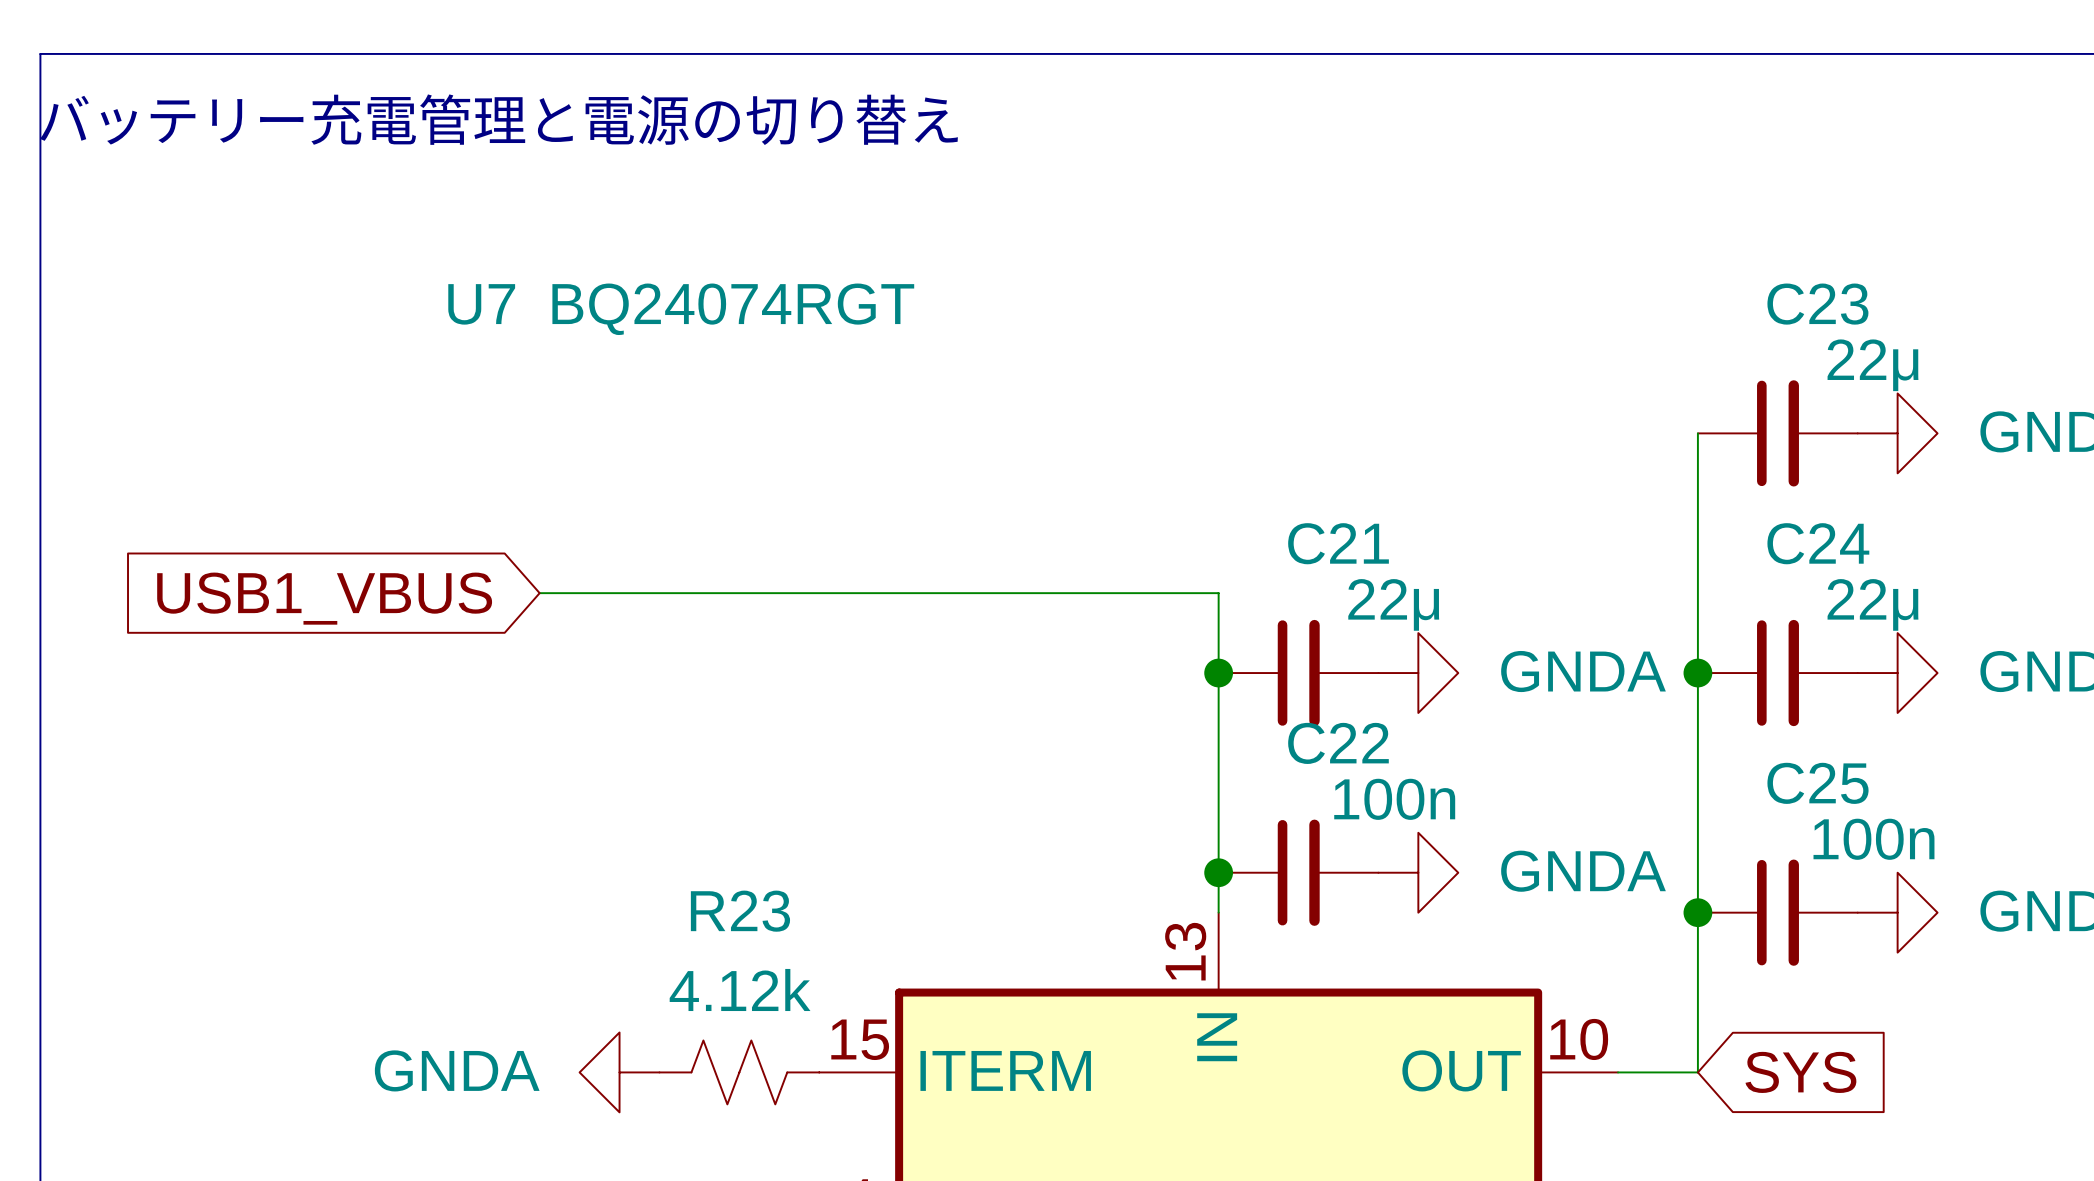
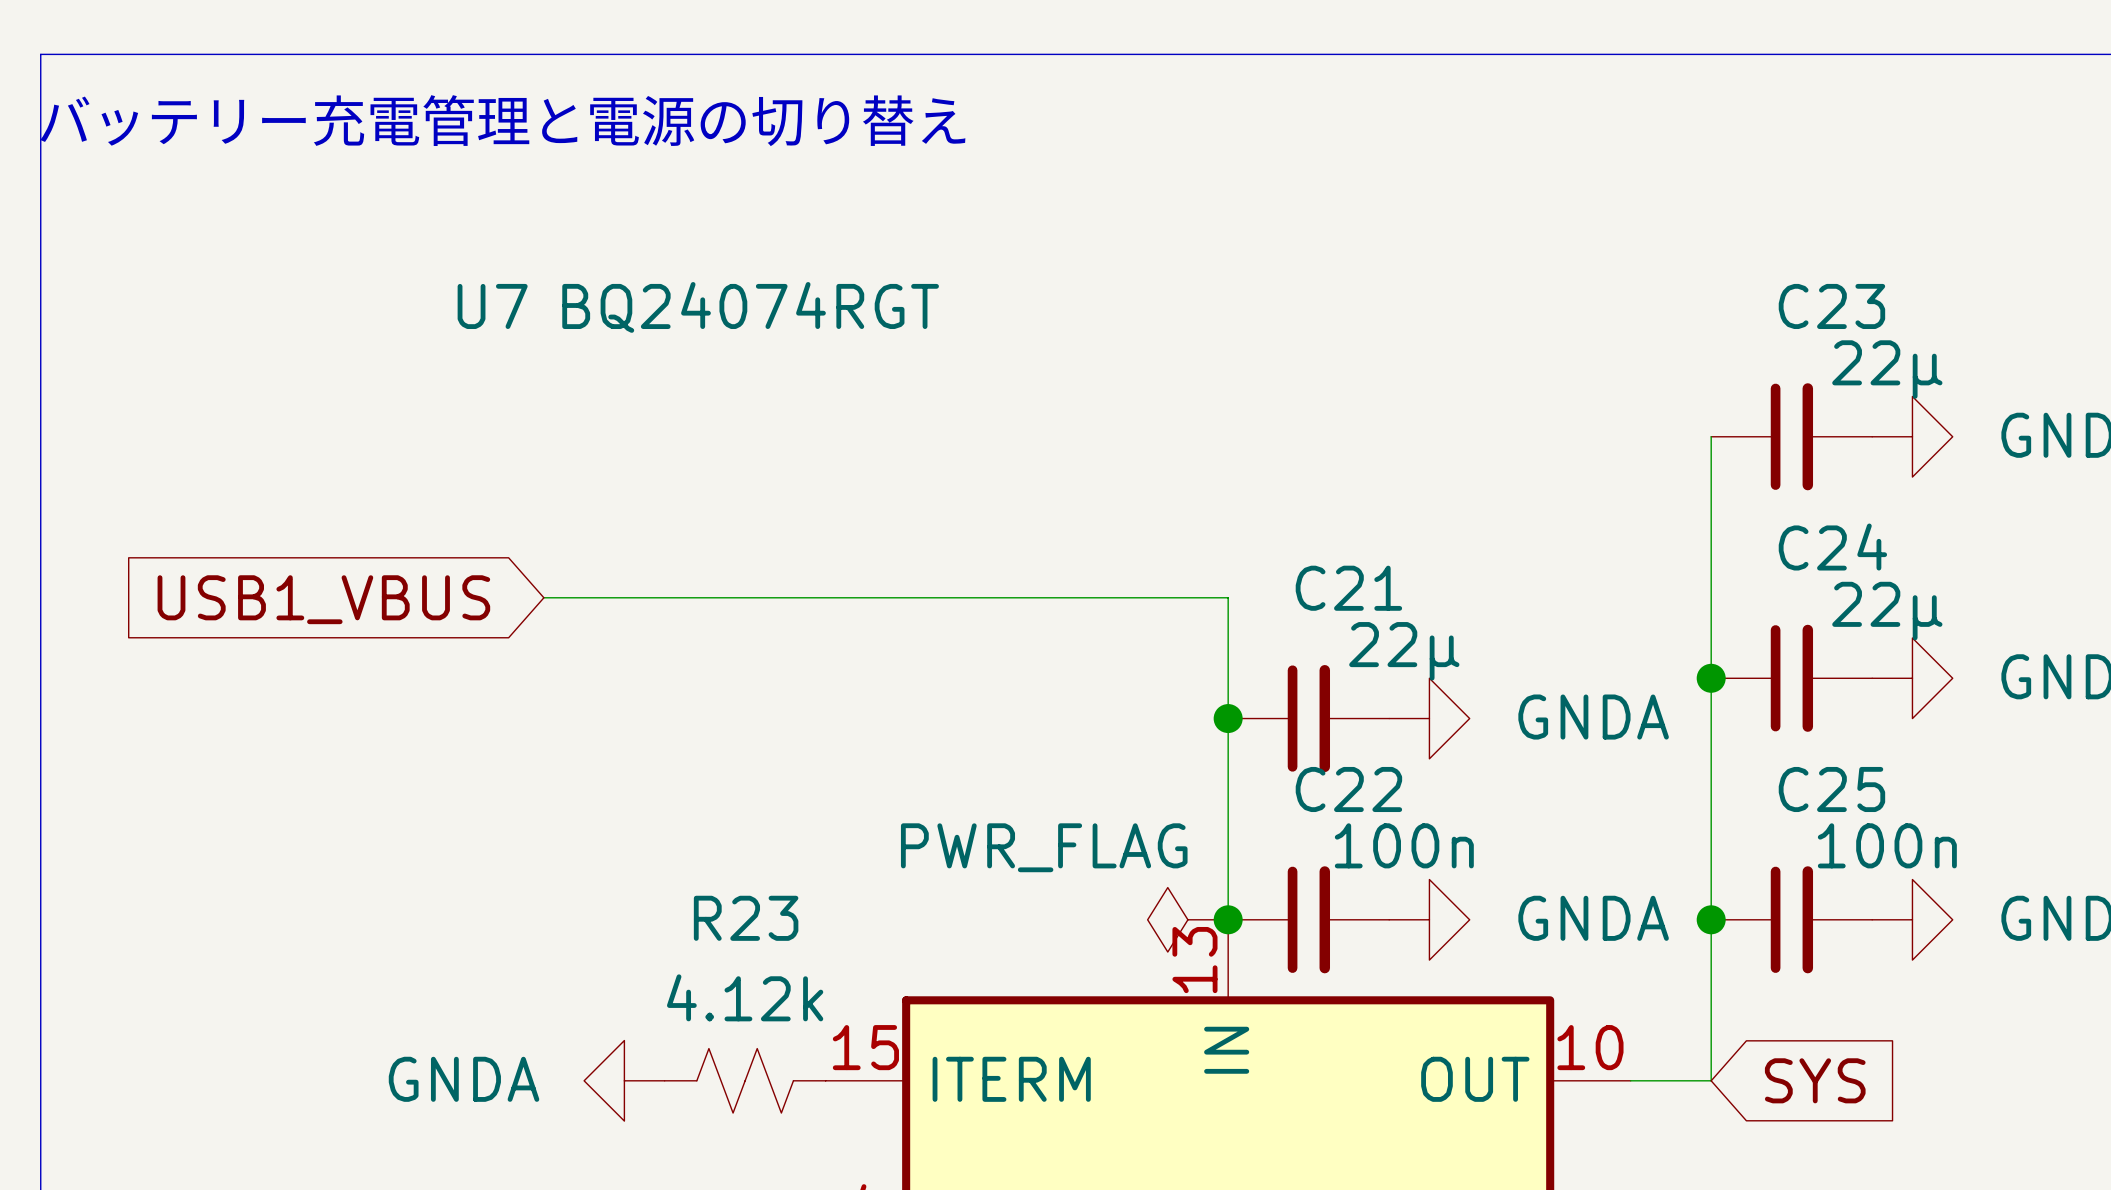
junction position: (1218, 673) -> (1228, 718)
C21 position: (1298, 673) -> (1308, 718)
power symbol position: GNDA (1418, 673) -> GNDA (1429, 718)
junction position: (1218, 872) -> (1228, 919)
C22 position: (1298, 872) -> (1308, 919)
power symbol position: GNDA (1418, 872) -> GNDA (1429, 919)
power symbol: none -> PWR_FLAG (1187, 919)

